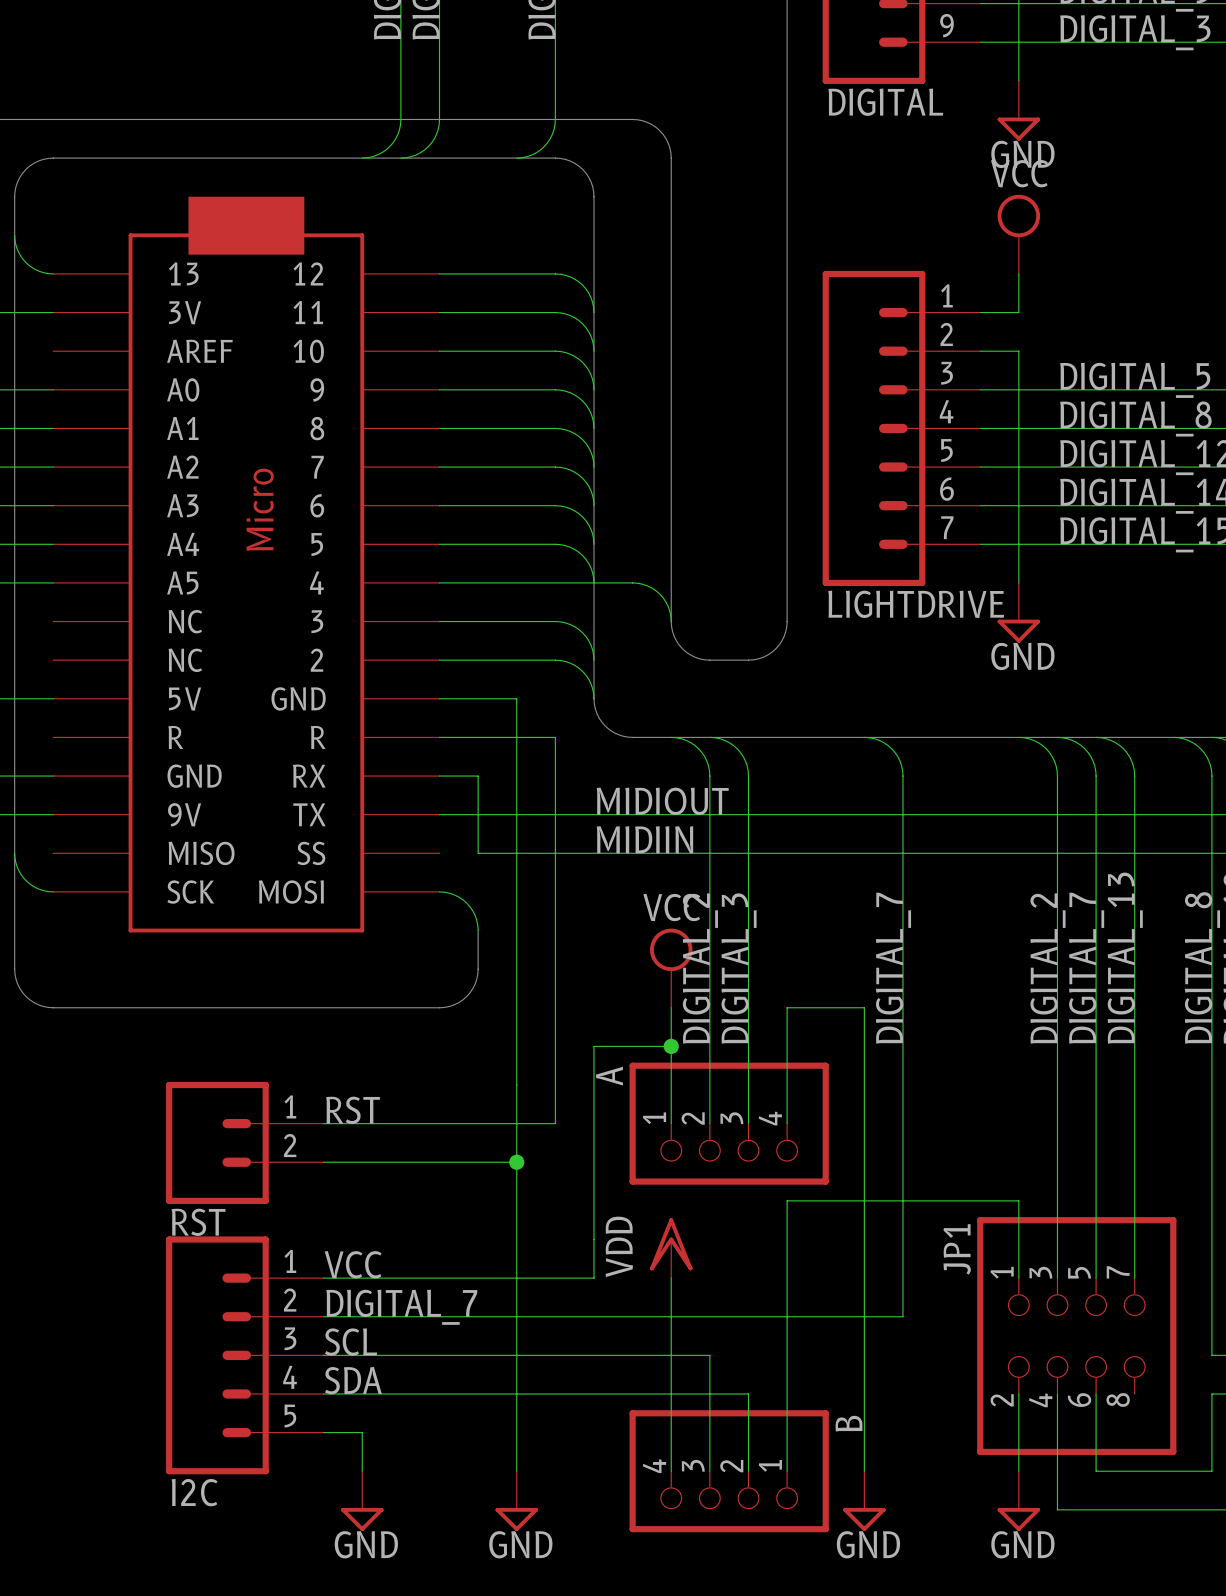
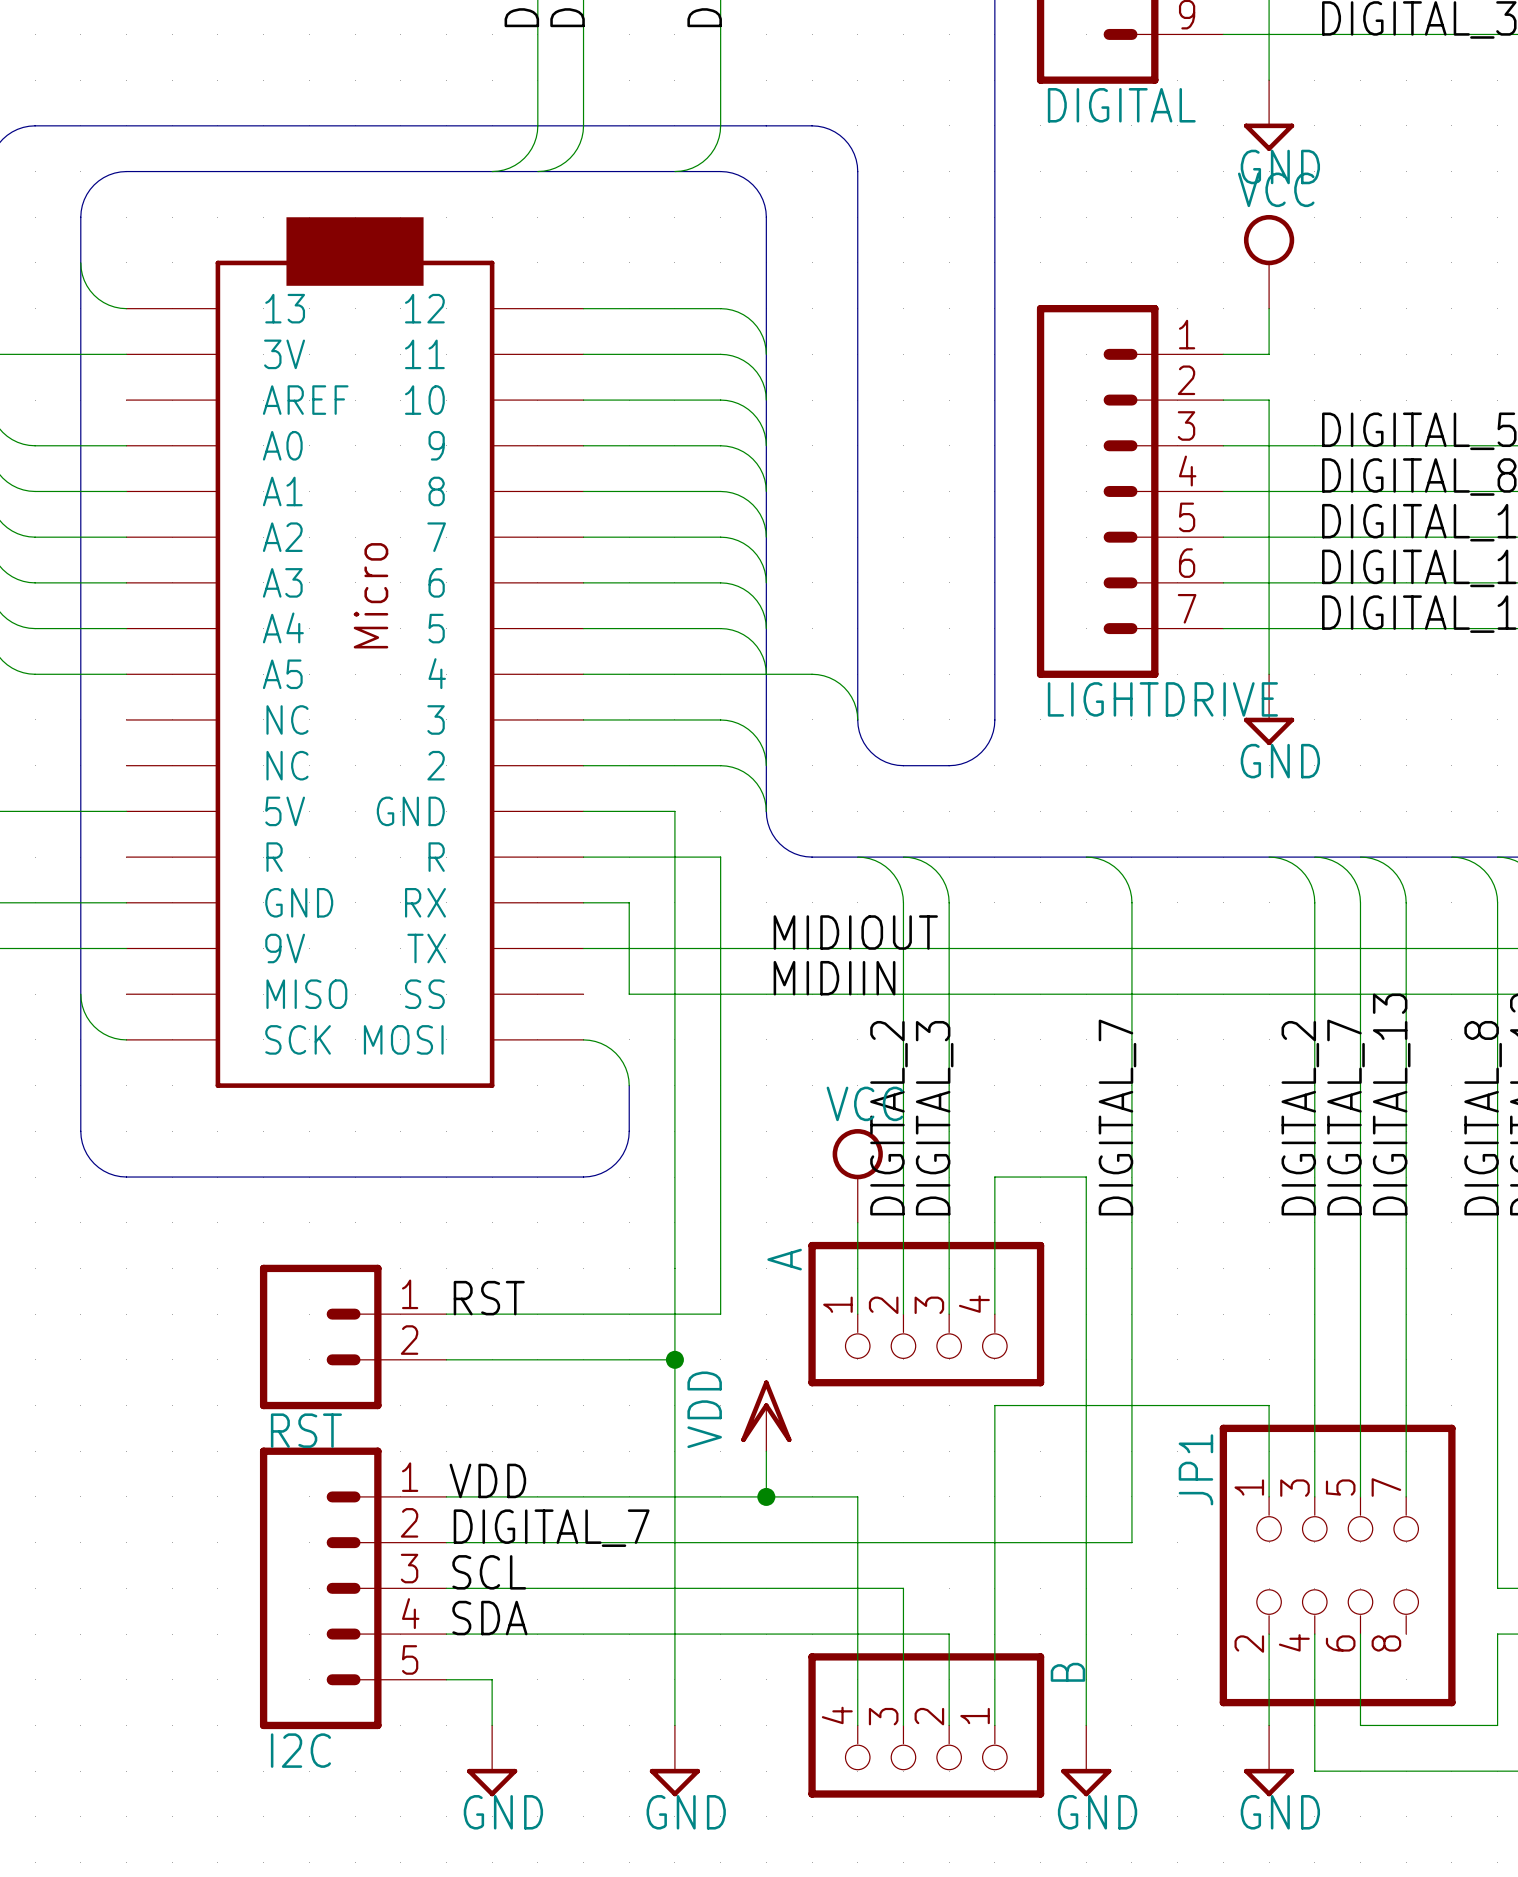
power symbol position: VCC (671, 968) -> VCC (857, 1175)
wire: (671, 1007) (671, 1046) (594, 1046) (594, 1239) -> none
junction: (671, 1046) -> none
power symbol position: VDD (671, 1248) -> VDD (766, 1415)
label: VCC (353, 1264) -> VDD (487, 1480)
wire: none -> (766, 1496) (857, 1496)
junction: none -> (766, 1496)

